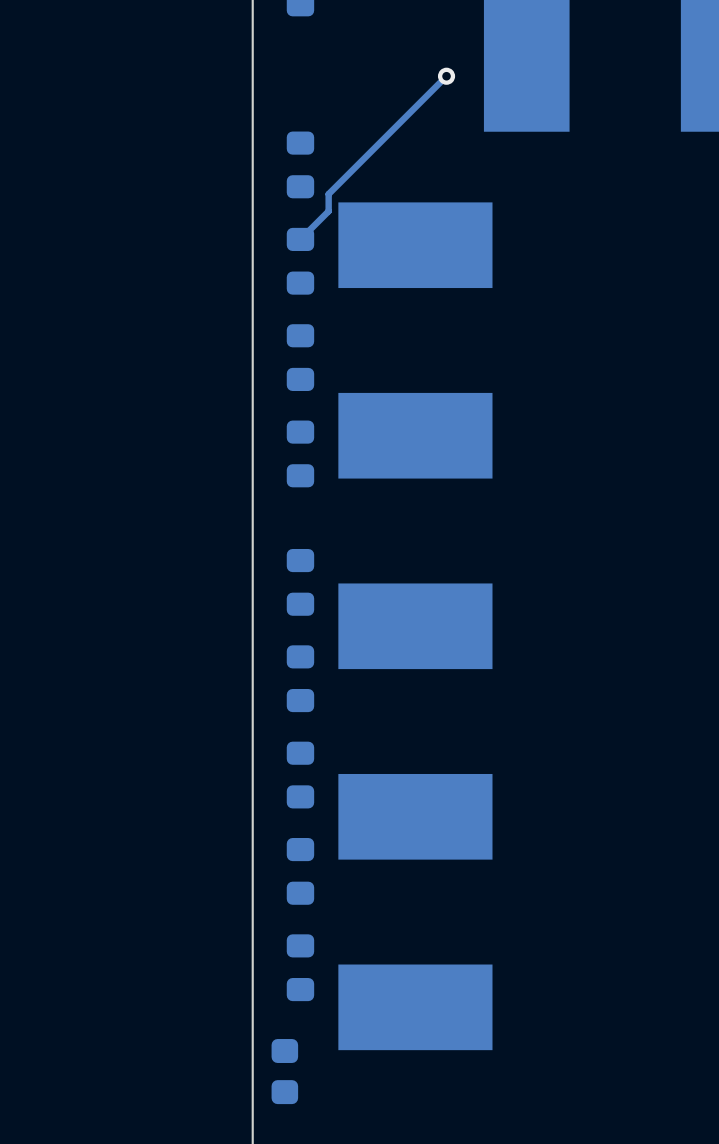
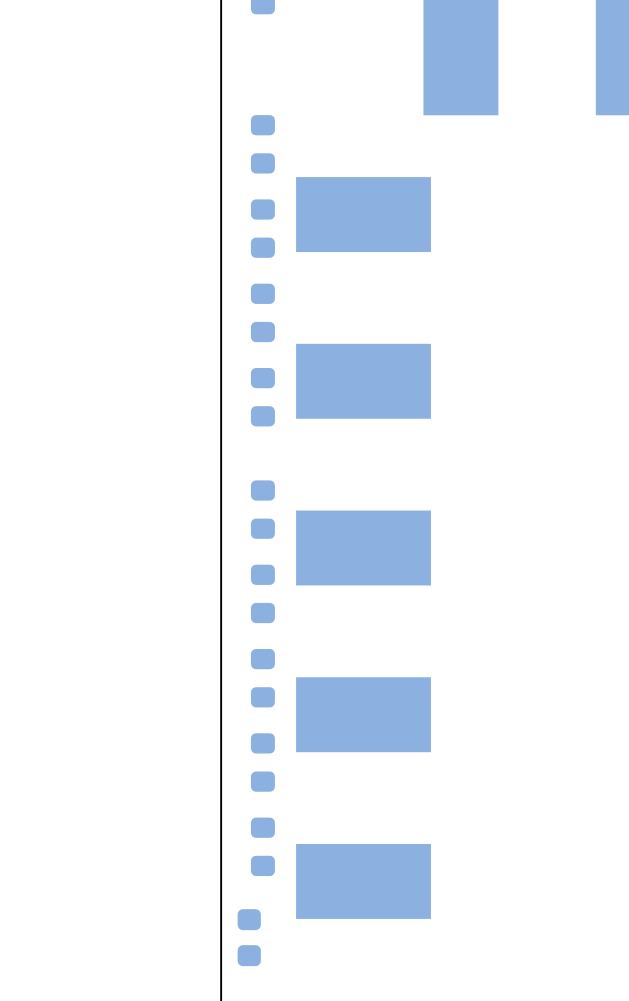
bottom track: (446, 76) (328, 194) (328, 211) (300, 239) -> none
via: (446, 76) -> none

